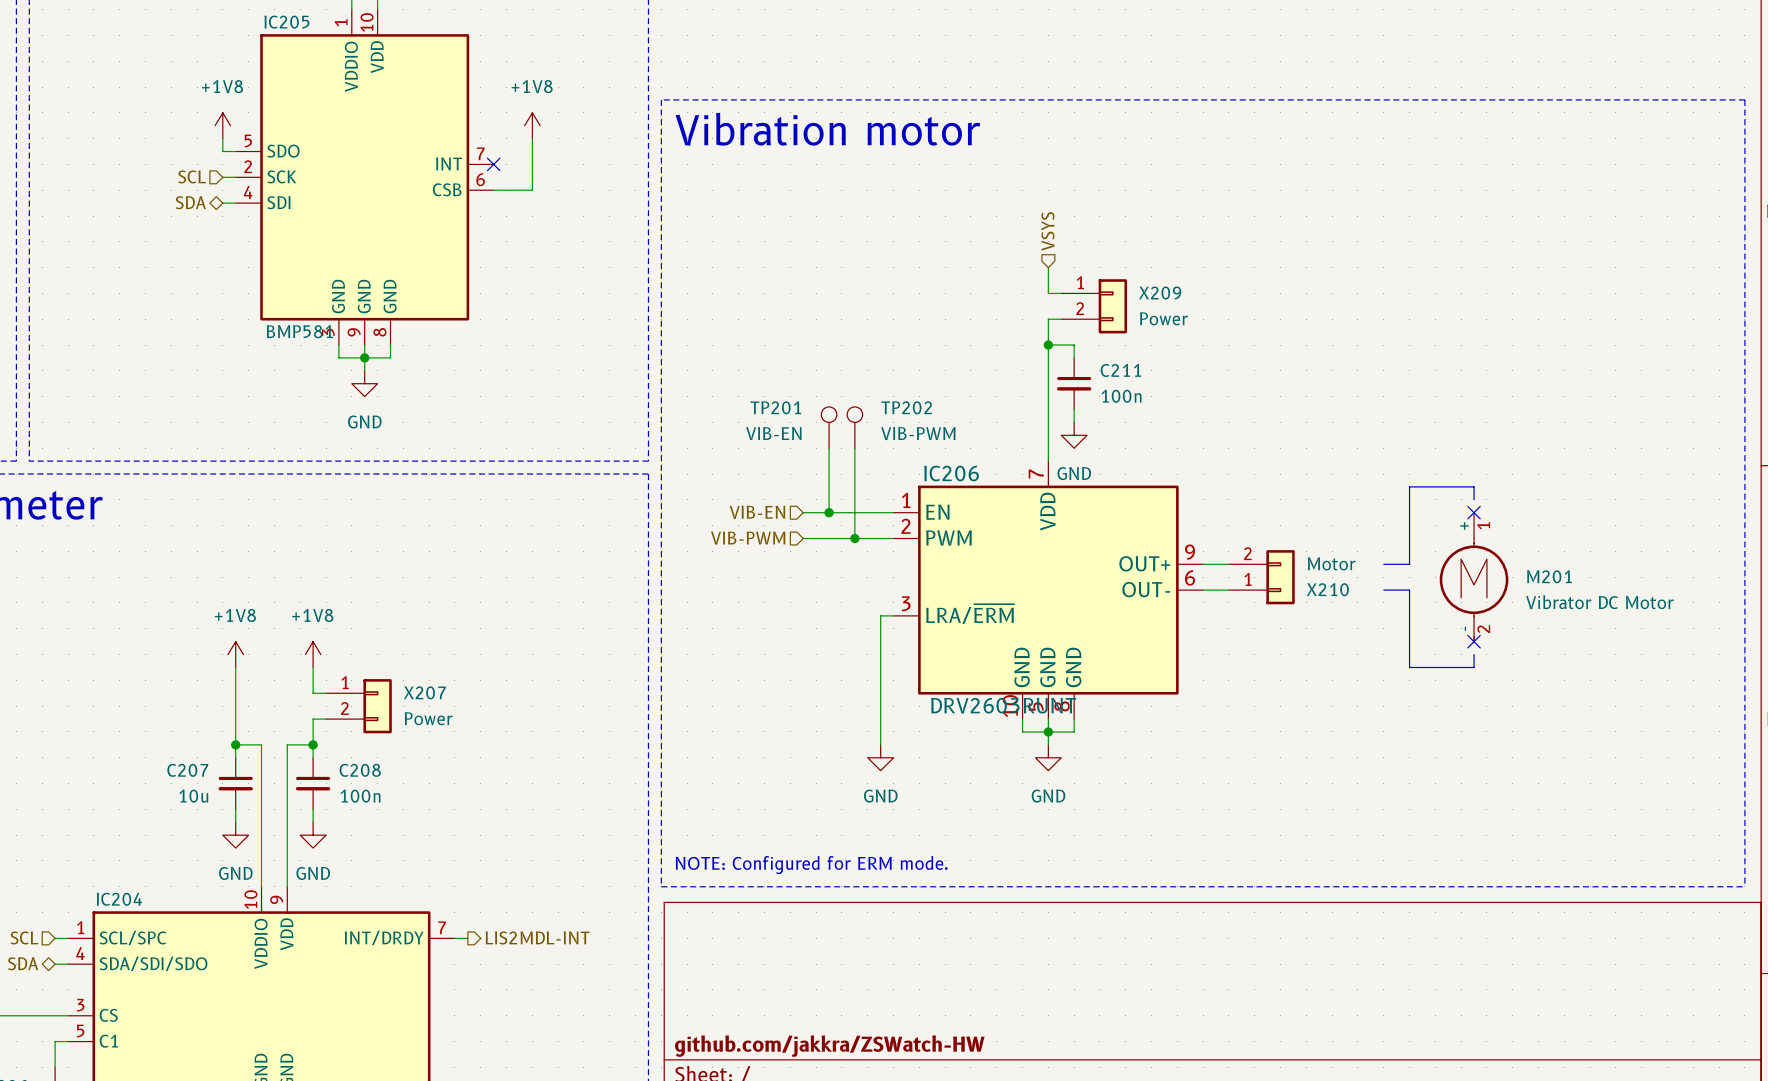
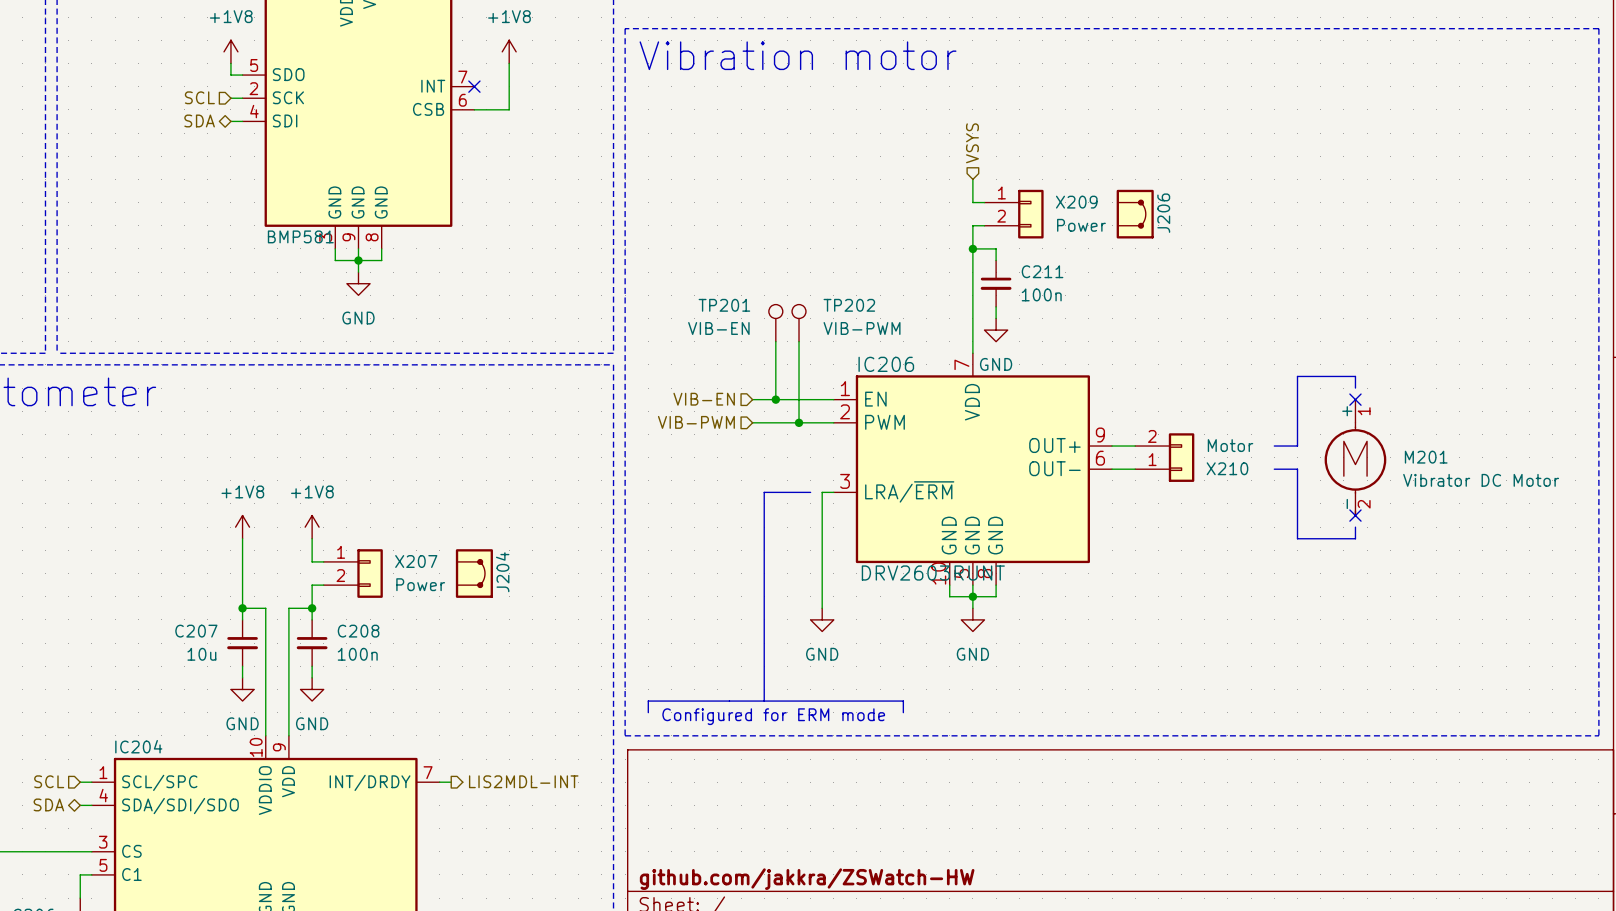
J206: none -> (1135, 214)
line: none -> (810, 492) (764, 492) (764, 701)
J204: none -> (474, 573)
line: none -> (648, 712) (648, 701) (903, 701) (903, 712)
text: NOTE: Configured for ERM mode. (811, 865) -> Configured for ERM mode (773, 716)

